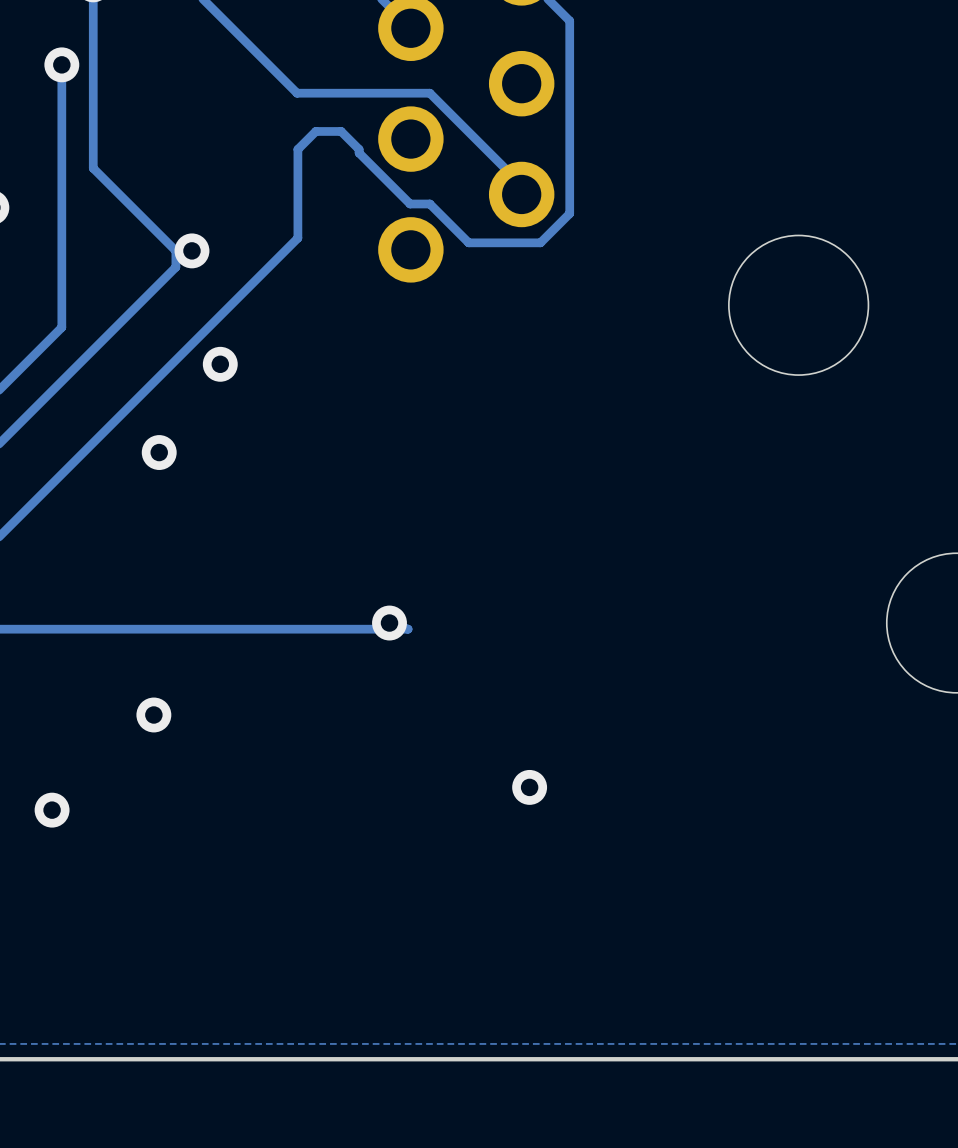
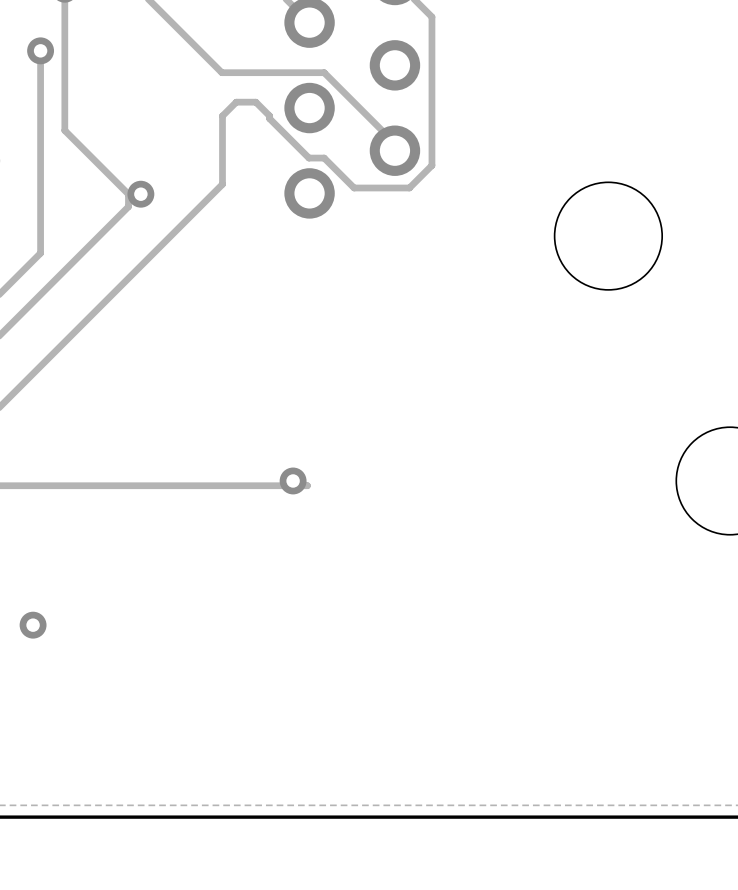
via: (220, 364) -> none
via: (159, 452) -> none
via: (153, 714) -> none
via: (529, 787) -> none

